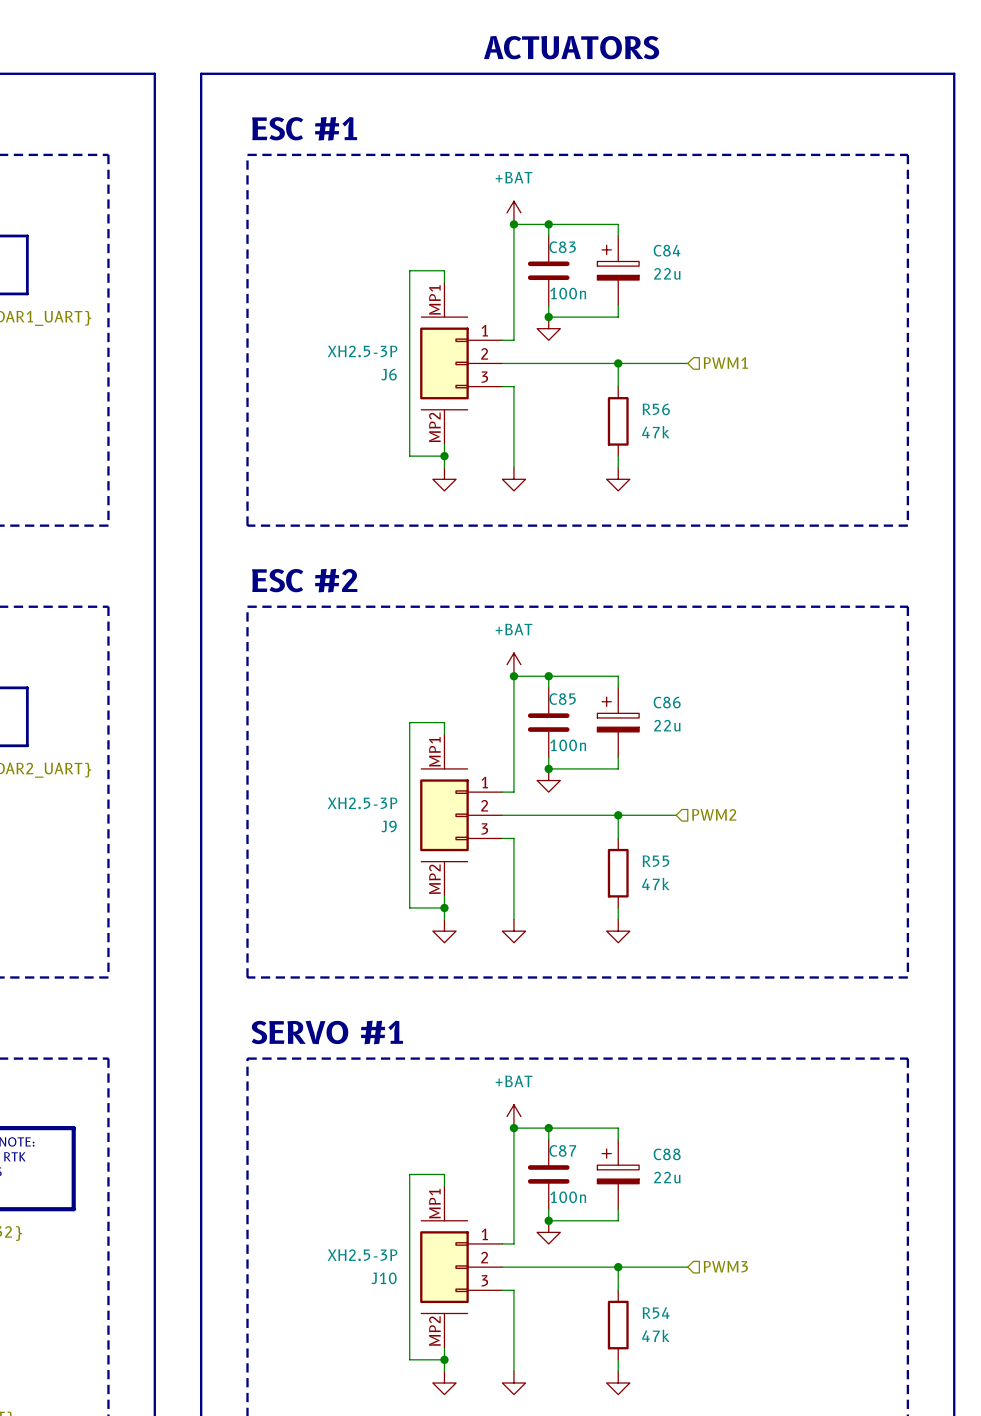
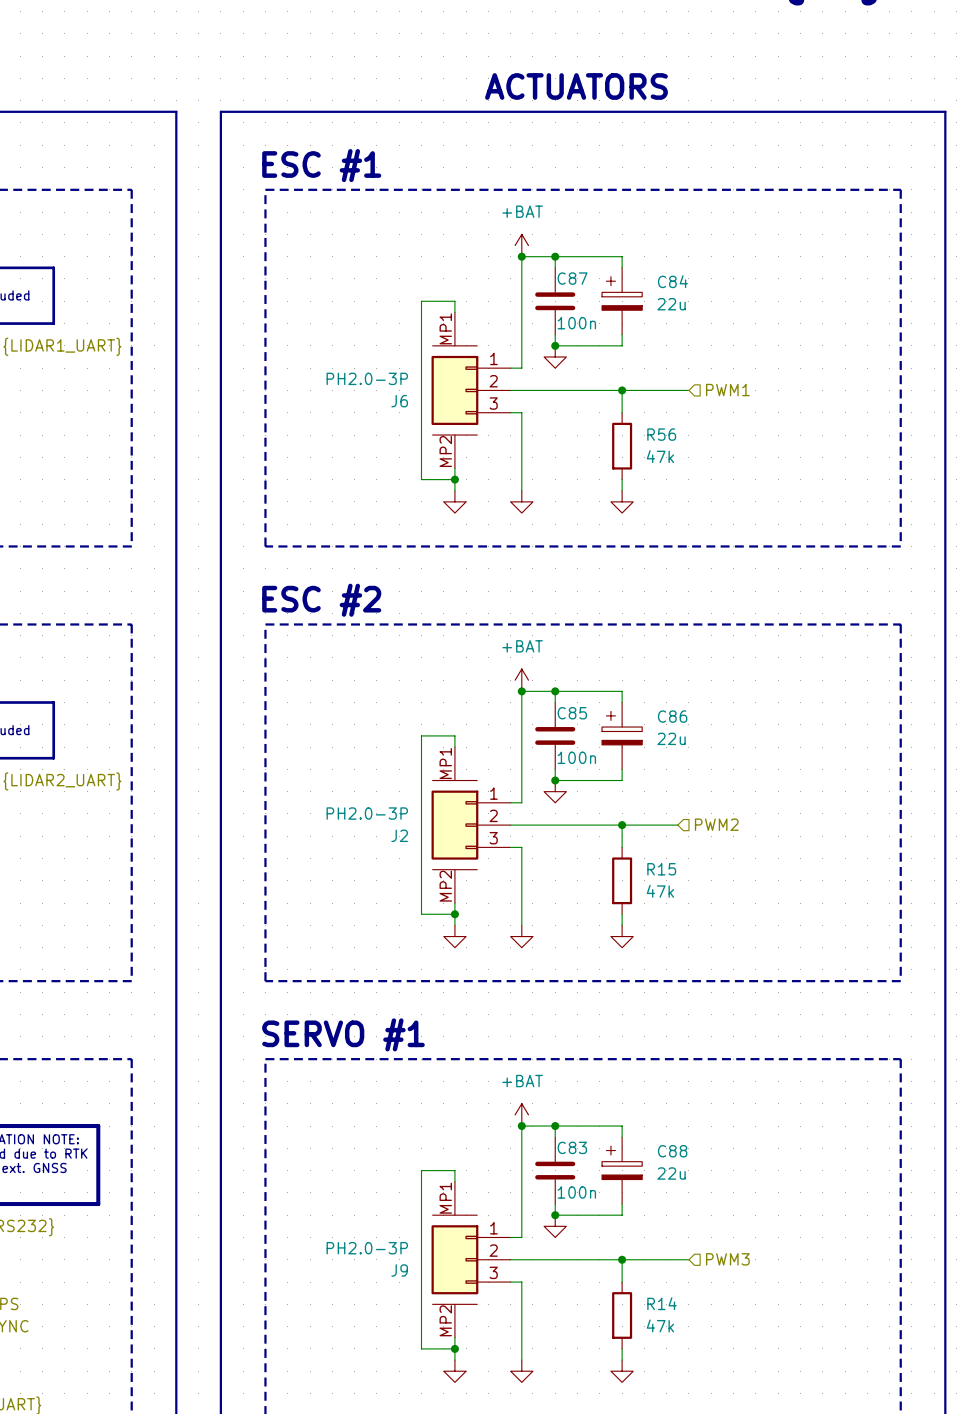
C83 name: C83 (562, 247) -> C87 (572, 278)
J6 value: XH2.5-3P (362, 351) -> PH2.0-3P (367, 378)
J9 value: XH2.5-3P (362, 803) -> PH2.0-3P (367, 813)
J9 name: J9 (389, 826) -> J2 (399, 835)
R55 name: R55 (655, 861) -> R15 (661, 869)
C87 name: C87 (562, 1150) -> C83 (572, 1147)
J10 value: XH2.5-3P (362, 1255) -> PH2.0-3P (367, 1248)
J10 name: J10 (384, 1278) -> J9 (399, 1270)
R54 name: R54 (656, 1313) -> R14 (662, 1303)

